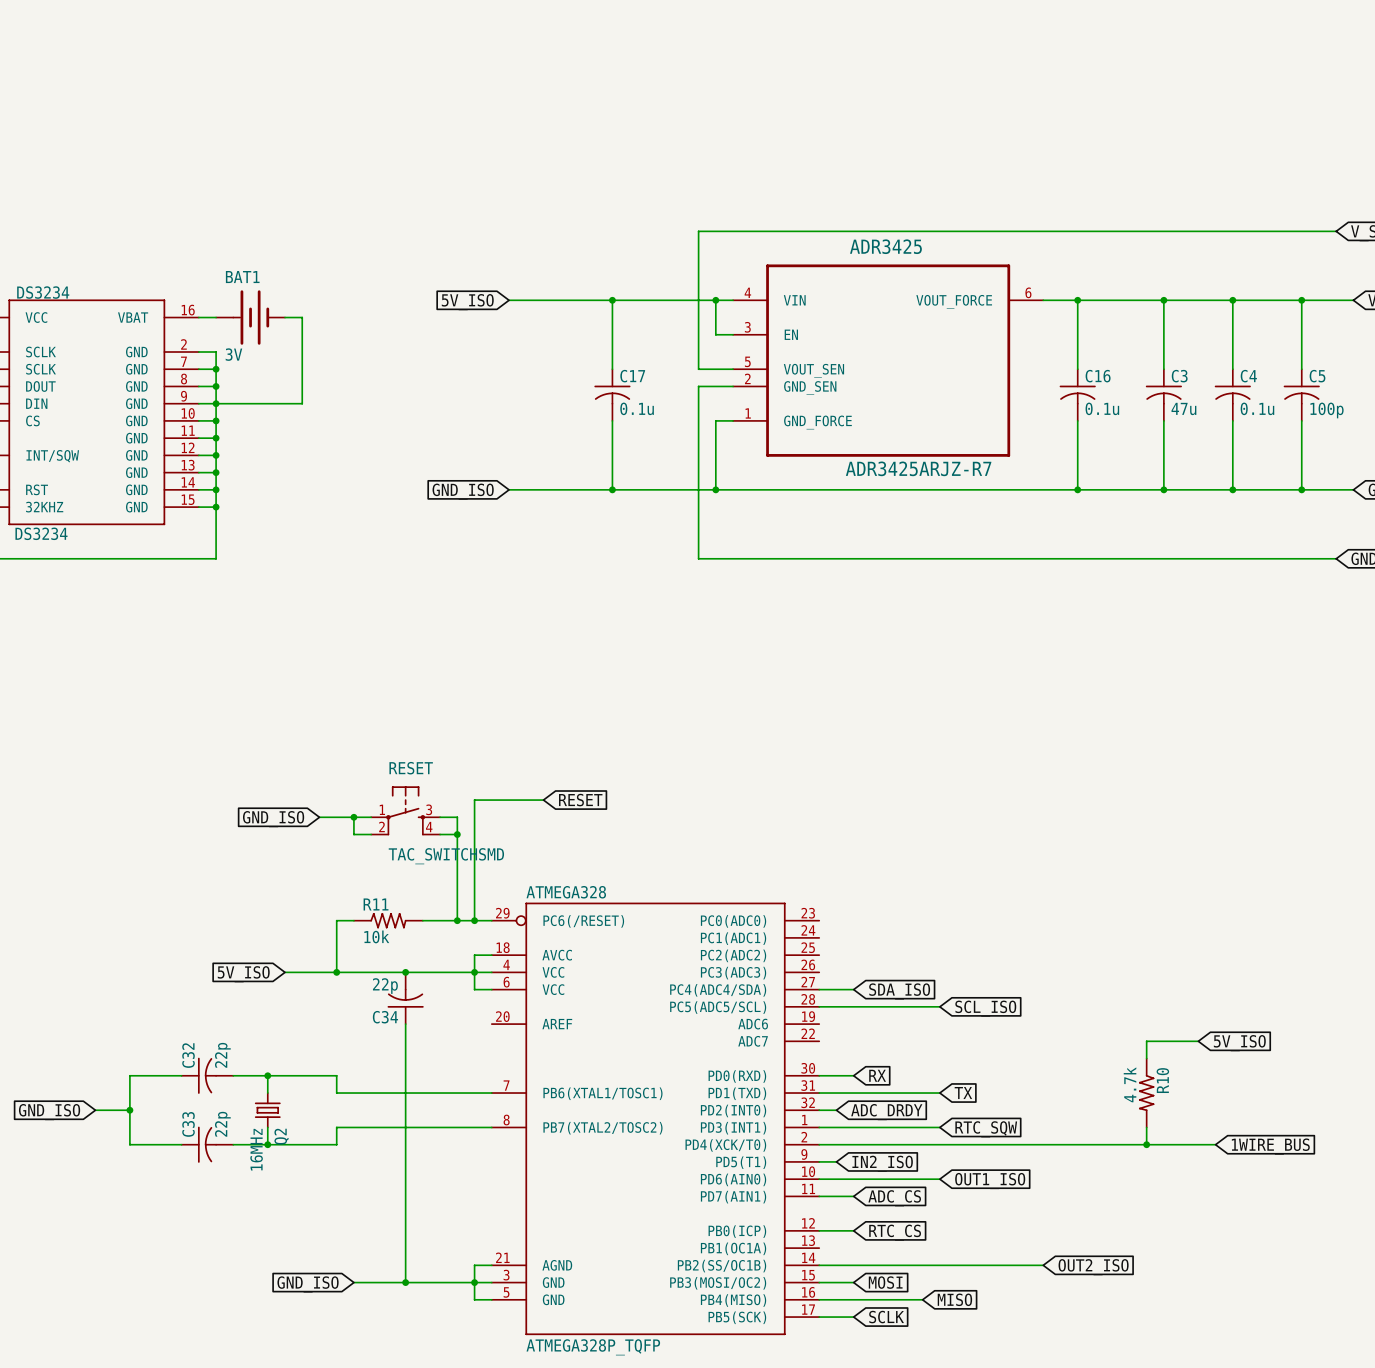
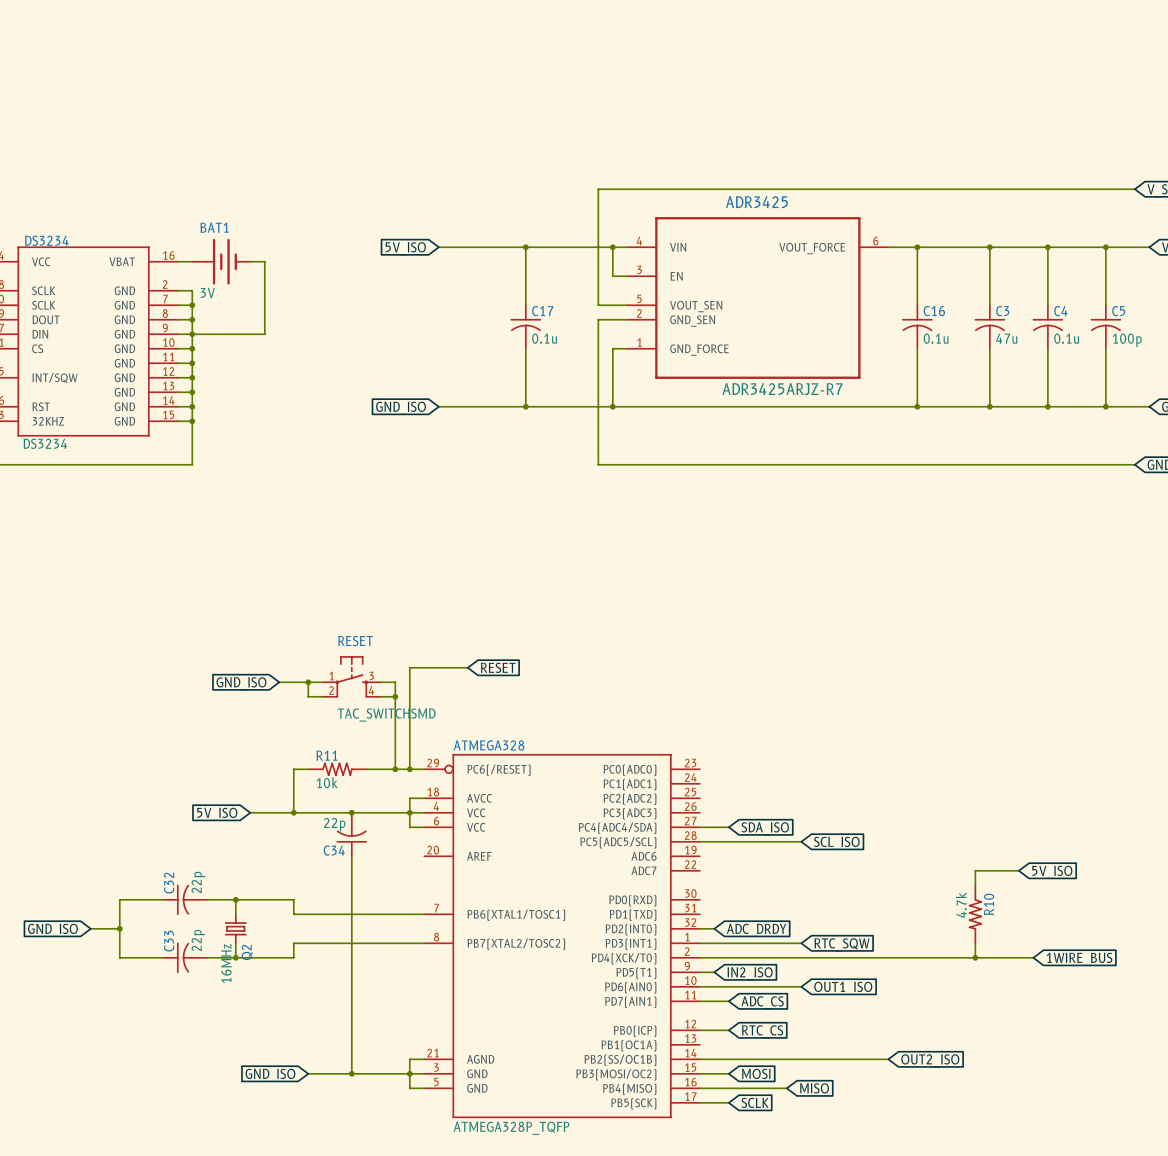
wire: (819, 1075) (853, 1075) -> none
global label: RX (877, 1075) -> none
wire: (819, 1093) (939, 1093) -> none
global label: TX (963, 1093) -> none

